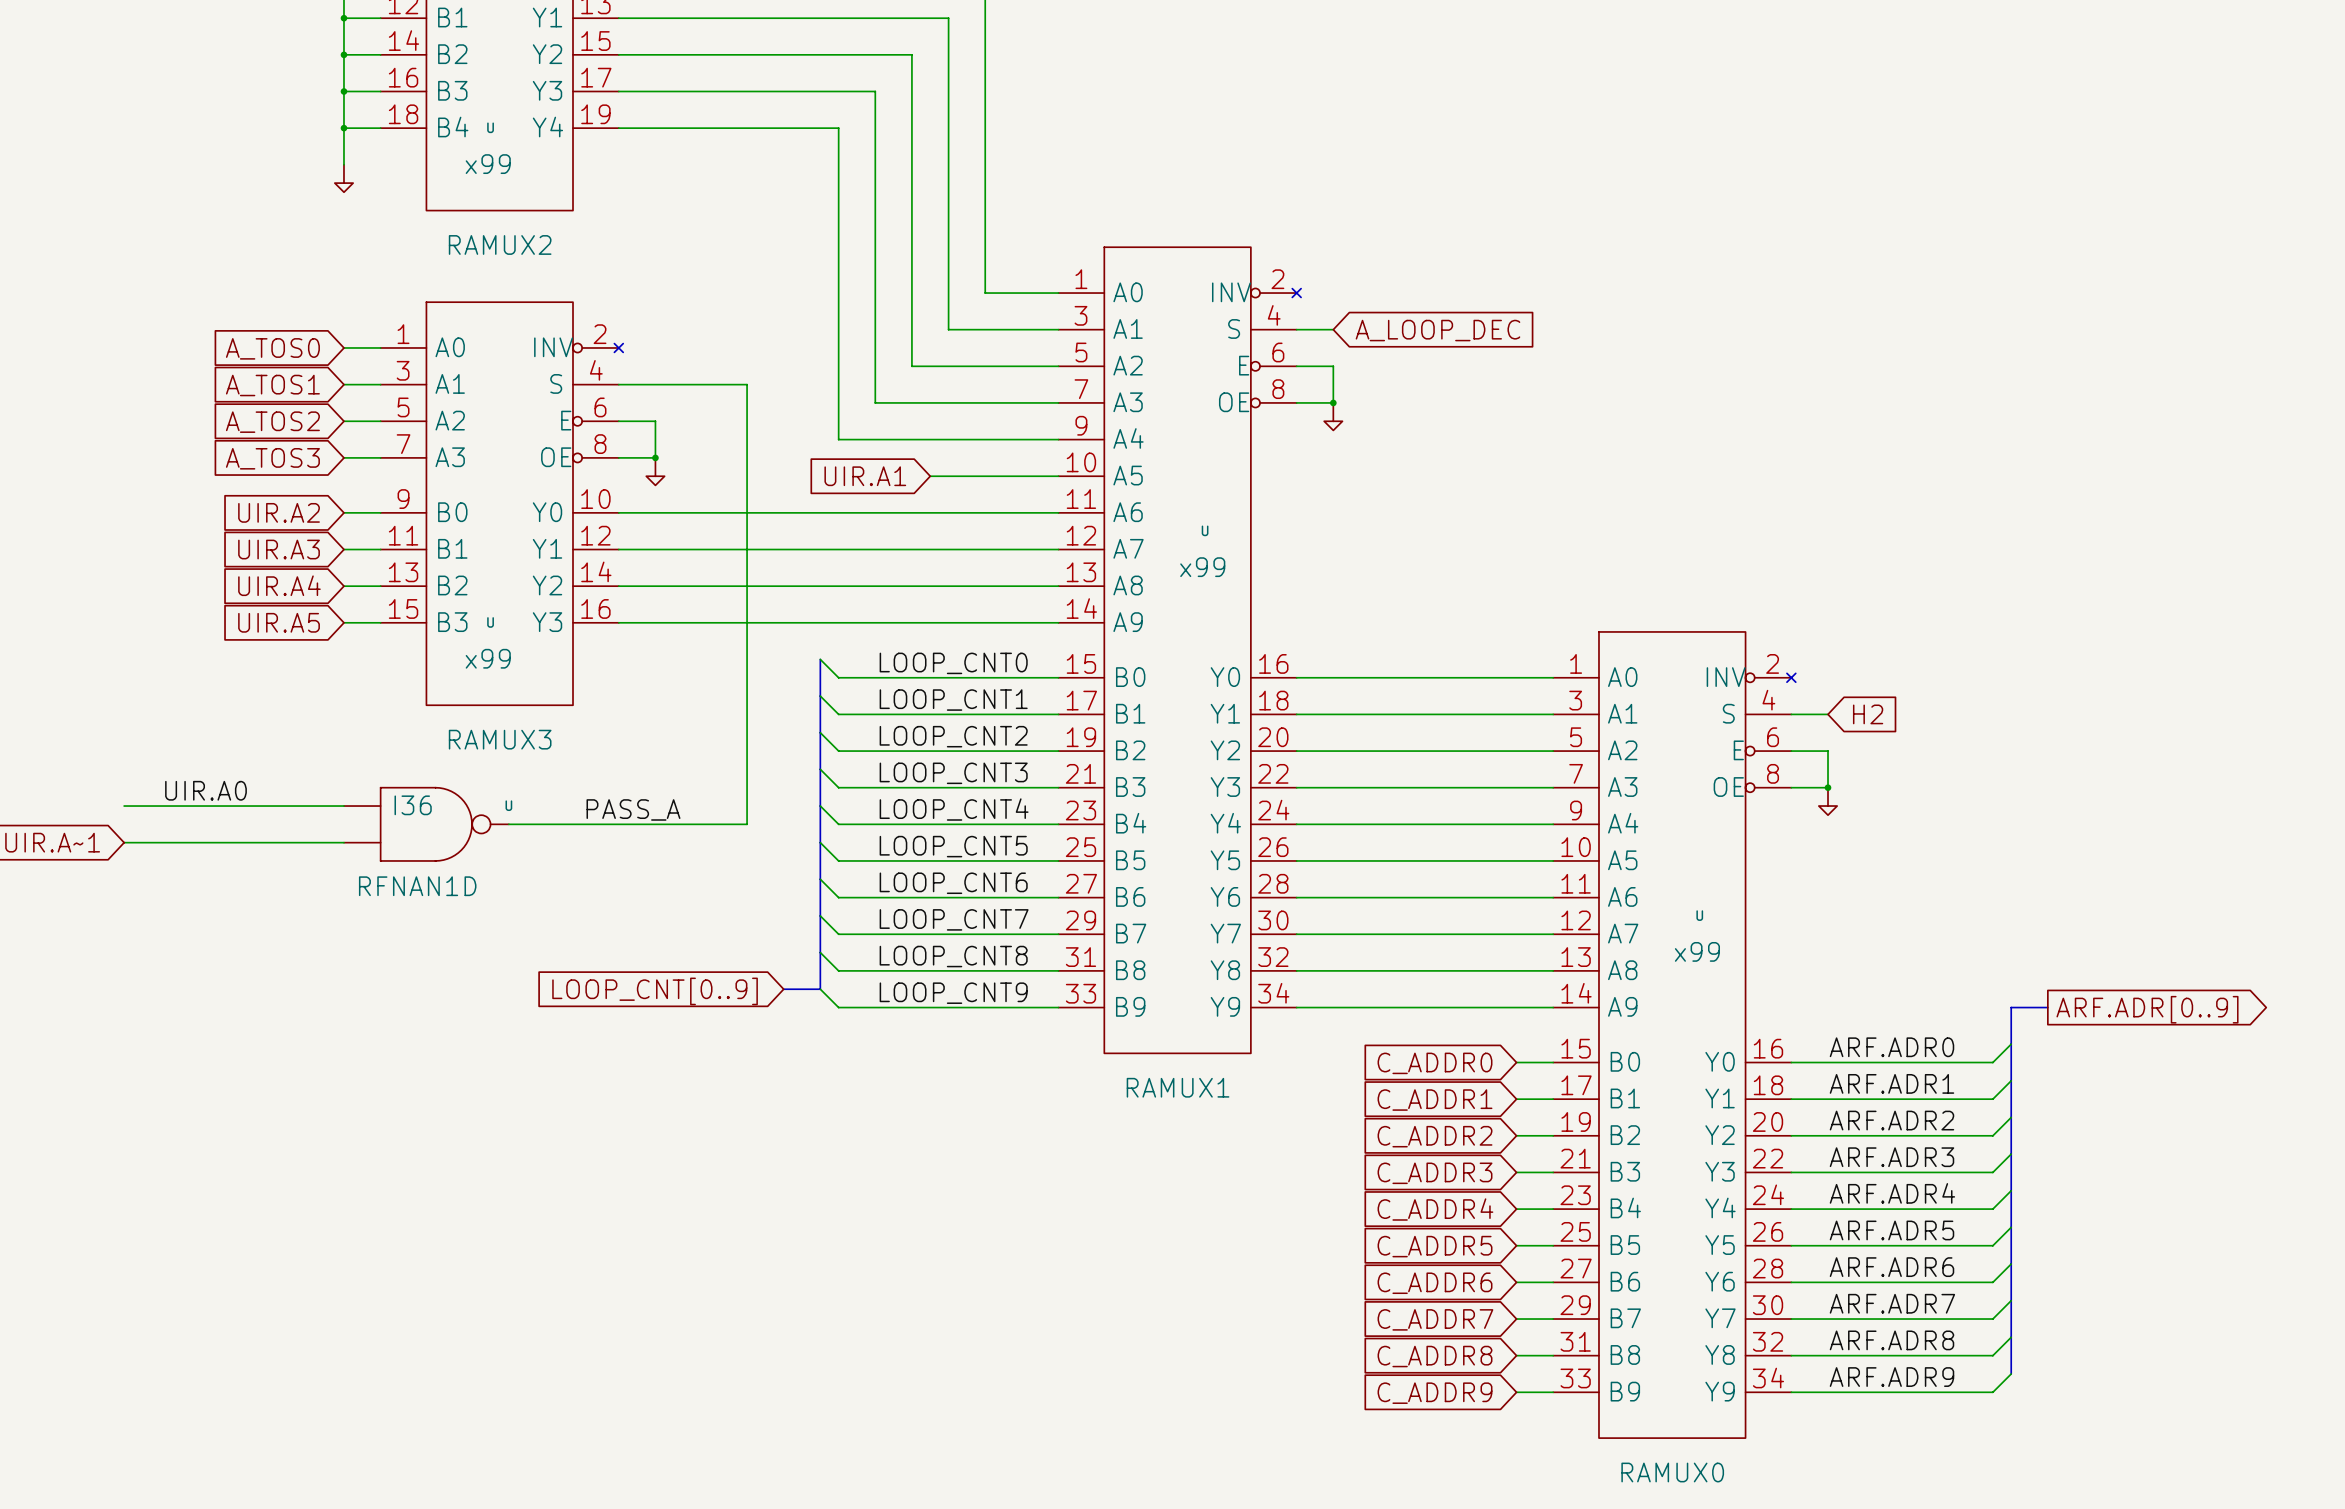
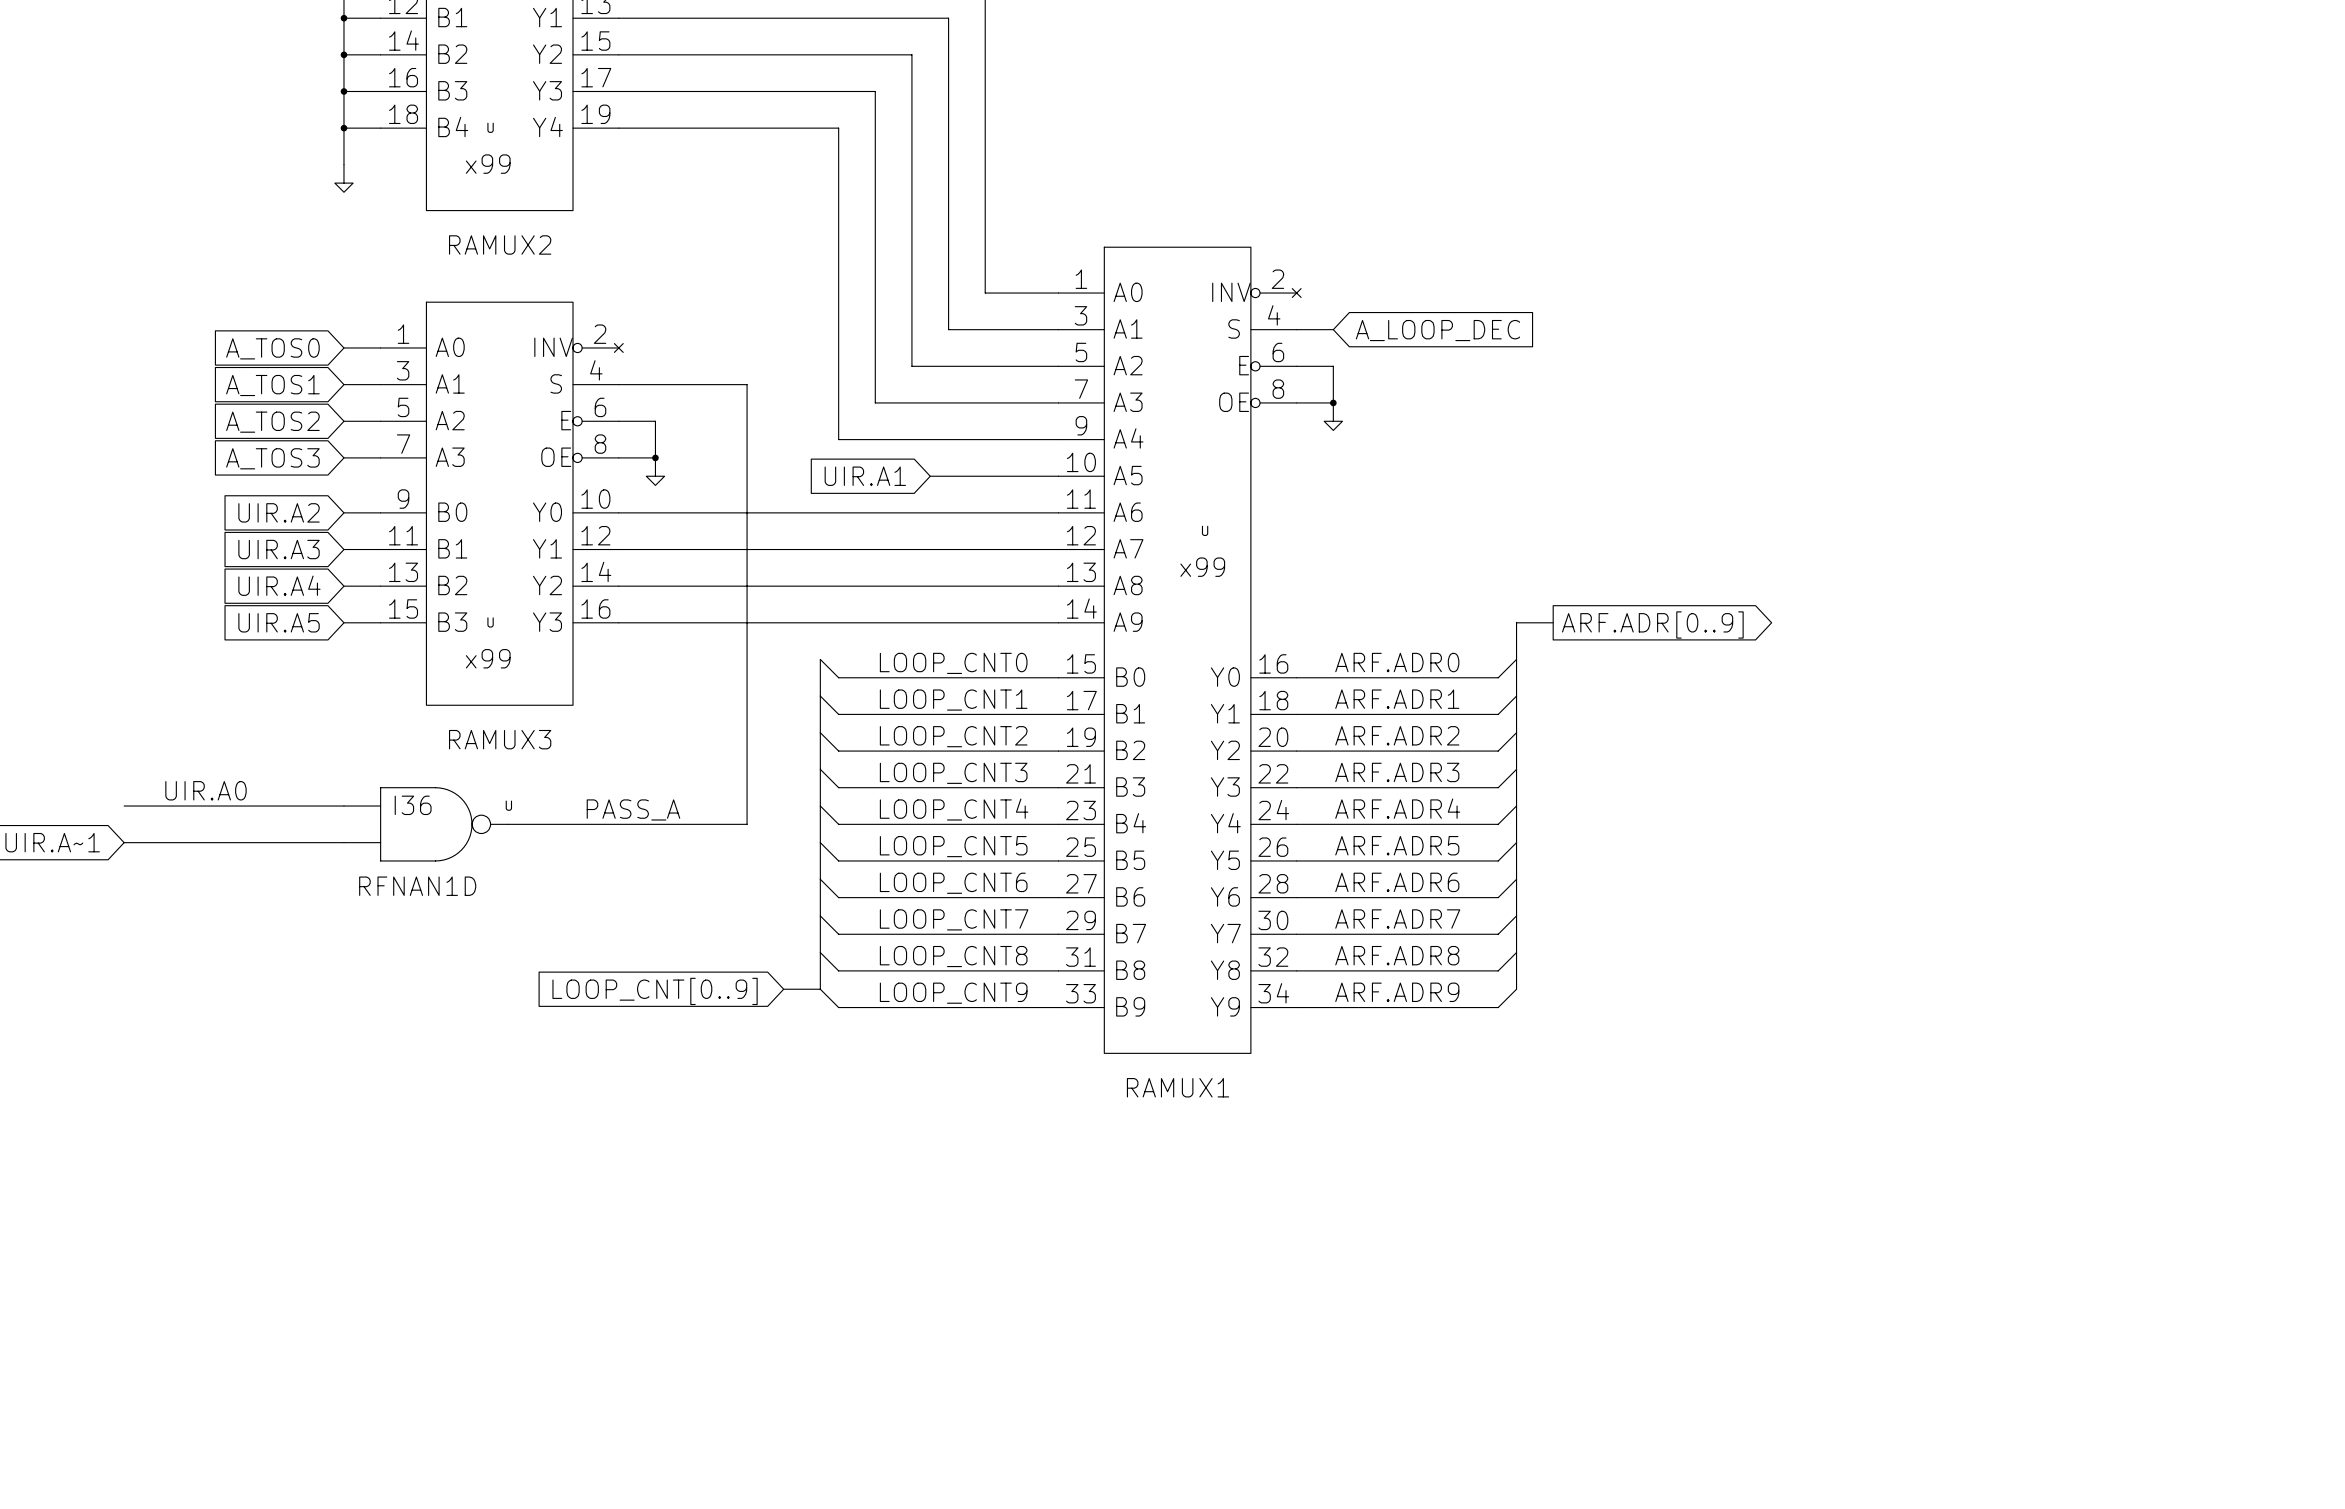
bus: none -> (1553, 622) (1516, 622) (1516, 989)
global label: none -> ARF.ADR[0..9] (1652, 624)
label: none -> ARF.ADR0 (1397, 662)
wire: (1498, 677) (1553, 677) -> (1498, 677) (1516, 659)
no-connect mark: (1791, 677) -> none
label: none -> ARF.ADR1 (1397, 699)
wire: (1498, 714) (1553, 714) -> (1498, 714) (1516, 696)
wire: (1791, 714) (1828, 714) -> none
global label: H2 (1868, 714) -> none
label: none -> ARF.ADR2 (1397, 735)
wire: (1498, 751) (1553, 751) -> (1498, 751) (1516, 732)
wire: (1791, 751) (1828, 751) (1828, 787) (1791, 787) -> none
label: none -> ARF.ADR3 (1397, 772)
wire: (1498, 787) (1553, 787) -> (1498, 787) (1516, 769)
junction: (1828, 787) -> none
power symbol: (1828, 801) -> none
label: none -> ARF.ADR4 (1397, 808)
wire: (1498, 824) (1553, 824) -> (1498, 824) (1516, 806)
label: none -> ARF.ADR5 (1397, 845)
wire: (1498, 860) (1553, 860) -> (1498, 860) (1516, 842)
label: none -> ARF.ADR6 (1397, 882)
wire: (1498, 897) (1553, 897) -> (1498, 897) (1516, 879)
label: none -> ARF.ADR7 (1397, 919)
wire: (1498, 934) (1553, 934) -> (1498, 934) (1516, 915)
label: none -> ARF.ADR8 (1397, 955)
wire: (1498, 970) (1553, 970) -> (1498, 970) (1516, 952)
label: none -> ARF.ADR9 (1397, 992)
wire: (1498, 1007) (1553, 1007) -> (1498, 1007) (1516, 989)
bus: (2047, 1007) (2011, 1007) (2011, 1373) -> none
global label: ARF.ADR[0..9] (2147, 1009) -> none
U: (1672, 1035) -> none
wire: (2011, 1044) (1992, 1062) (1791, 1062) -> none
label: ARF.ADR0 (1891, 1047) -> none
wire: (1516, 1062) (1553, 1062) -> none
global label: C_ADDR0 (1435, 1063) -> none
wire: (2011, 1080) (1992, 1099) (1791, 1099) -> none
label: ARF.ADR1 (1891, 1083) -> none
wire: (1516, 1099) (1553, 1099) -> none
global label: C_ADDR1 (1435, 1100) -> none
wire: (2011, 1117) (1992, 1135) (1791, 1135) -> none
label: ARF.ADR2 (1891, 1120) -> none
wire: (1516, 1135) (1553, 1135) -> none
global label: C_ADDR2 (1435, 1136) -> none
wire: (2011, 1154) (1992, 1172) (1791, 1172) -> none
label: ARF.ADR3 (1891, 1157) -> none
wire: (1516, 1172) (1553, 1172) -> none
global label: C_ADDR3 (1435, 1173) -> none
wire: (2011, 1190) (1992, 1209) (1791, 1209) -> none
label: ARF.ADR4 (1892, 1193) -> none
global label: C_ADDR4 (1435, 1209) -> none
wire: (1516, 1209) (1553, 1209) -> none
wire: (2011, 1227) (1992, 1245) (1791, 1245) -> none
label: ARF.ADR5 (1891, 1230) -> none
wire: (1516, 1245) (1553, 1245) -> none
global label: C_ADDR5 (1435, 1246) -> none
wire: (2011, 1264) (1992, 1282) (1791, 1282) -> none
label: ARF.ADR6 (1891, 1267) -> none
wire: (1516, 1282) (1553, 1282) -> none
global label: C_ADDR6 (1435, 1283) -> none
wire: (2011, 1300) (1992, 1319) (1791, 1319) -> none
label: ARF.ADR7 (1892, 1303) -> none
global label: C_ADDR7 (1435, 1319) -> none
wire: (1516, 1319) (1553, 1319) -> none
wire: (2011, 1337) (1992, 1355) (1791, 1355) -> none
label: ARF.ADR8 (1891, 1340) -> none
wire: (1516, 1355) (1553, 1355) -> none
global label: C_ADDR8 (1435, 1356) -> none
wire: (2011, 1373) (1992, 1392) (1791, 1392) -> none
label: ARF.ADR9 (1891, 1377) -> none
wire: (1516, 1392) (1553, 1392) -> none
global label: C_ADDR9 (1435, 1393) -> none

